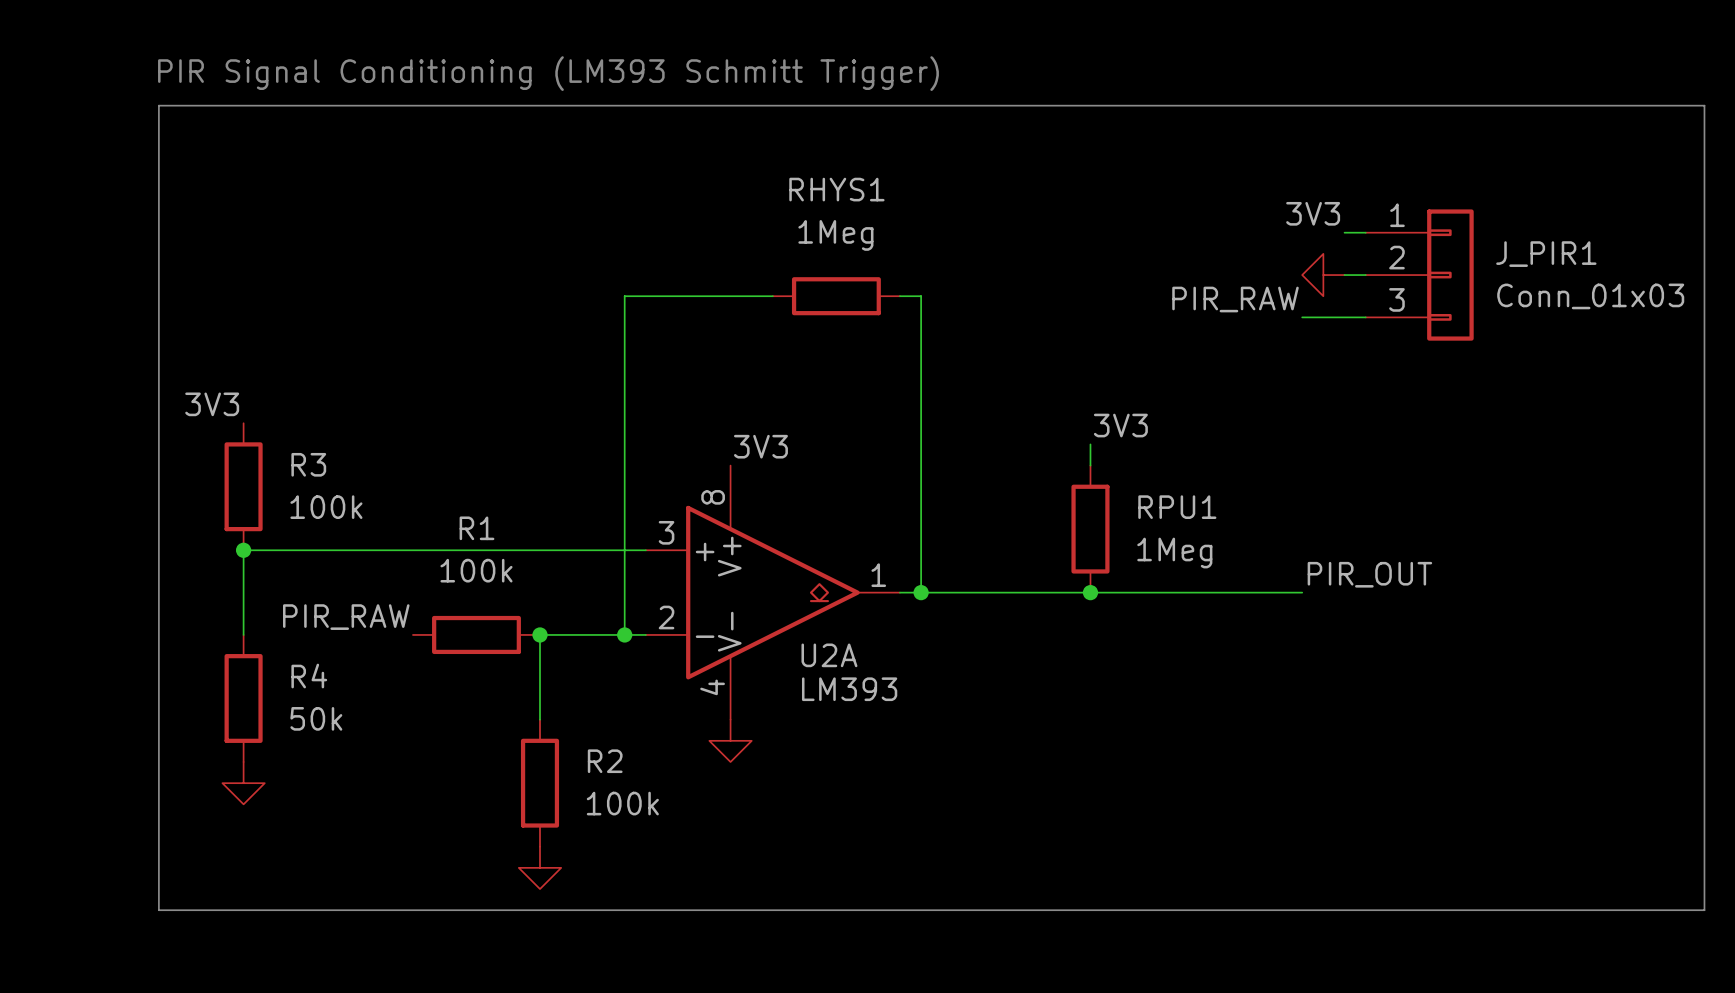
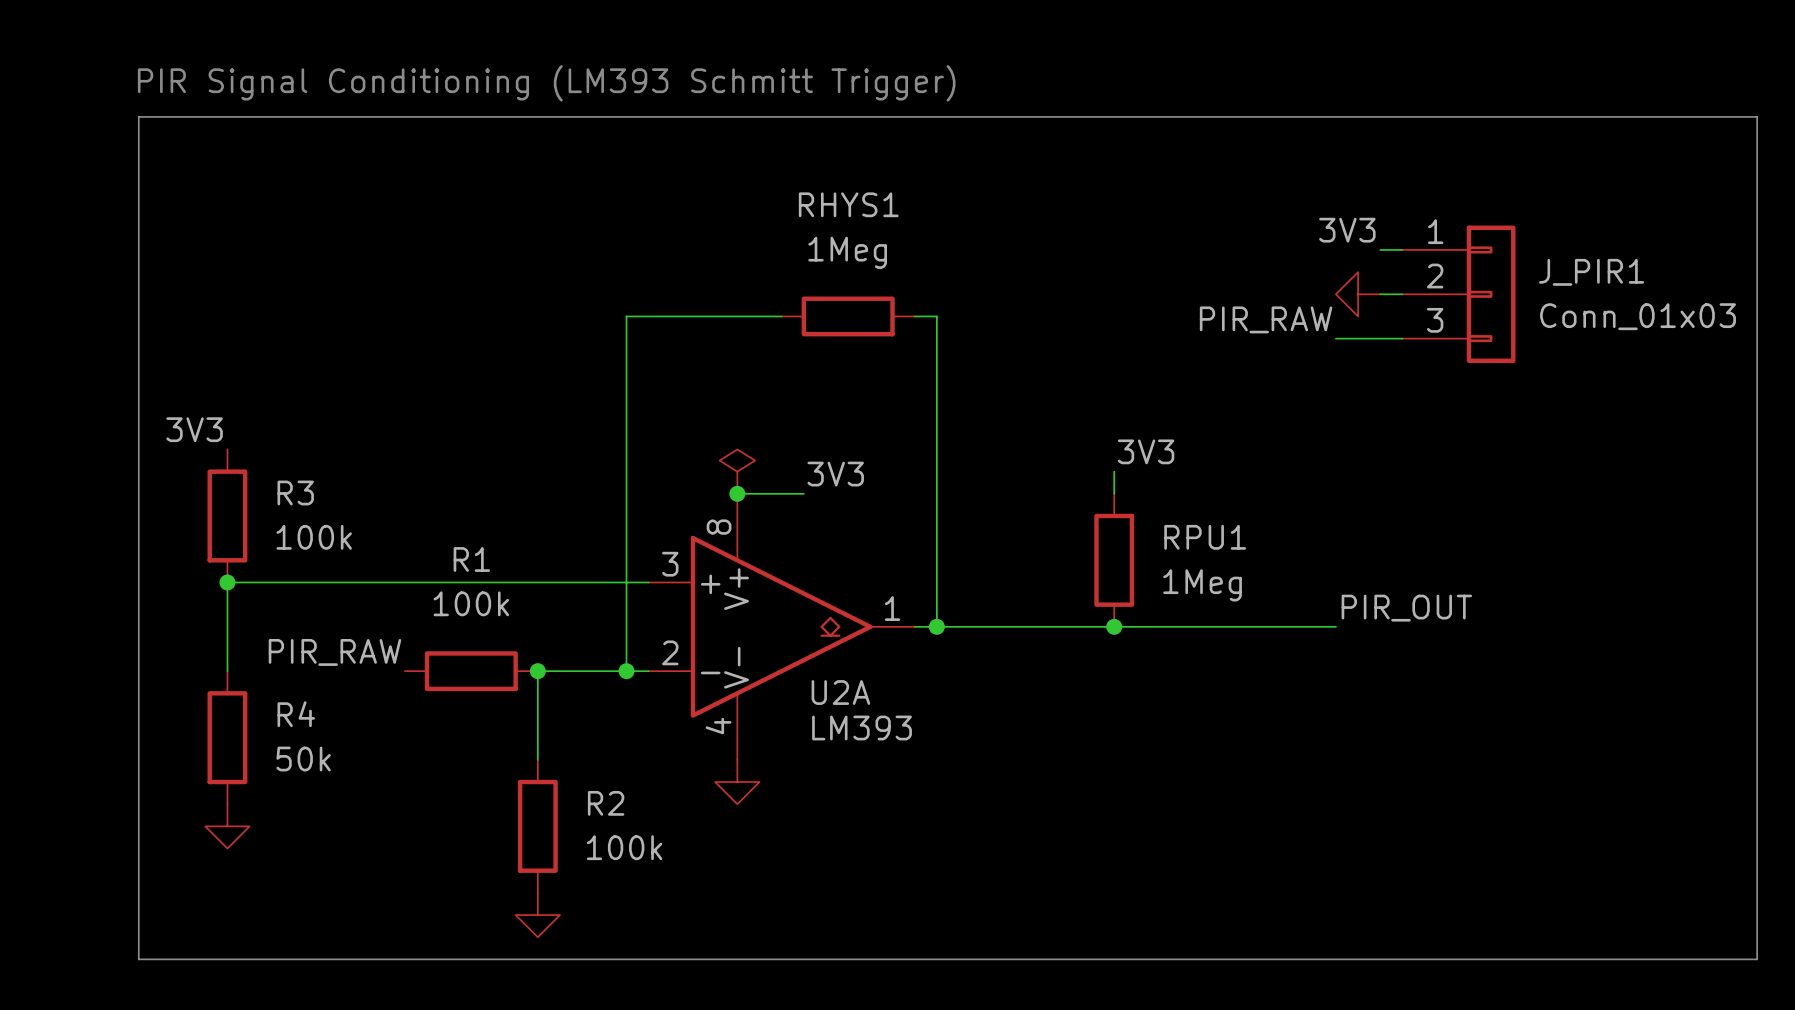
power symbol: none -> (737, 471)
label position: 3V3 (760, 446) -> 3V3 (835, 474)
wire: none -> (737, 493) (803, 493)
junction: none -> (737, 493)

